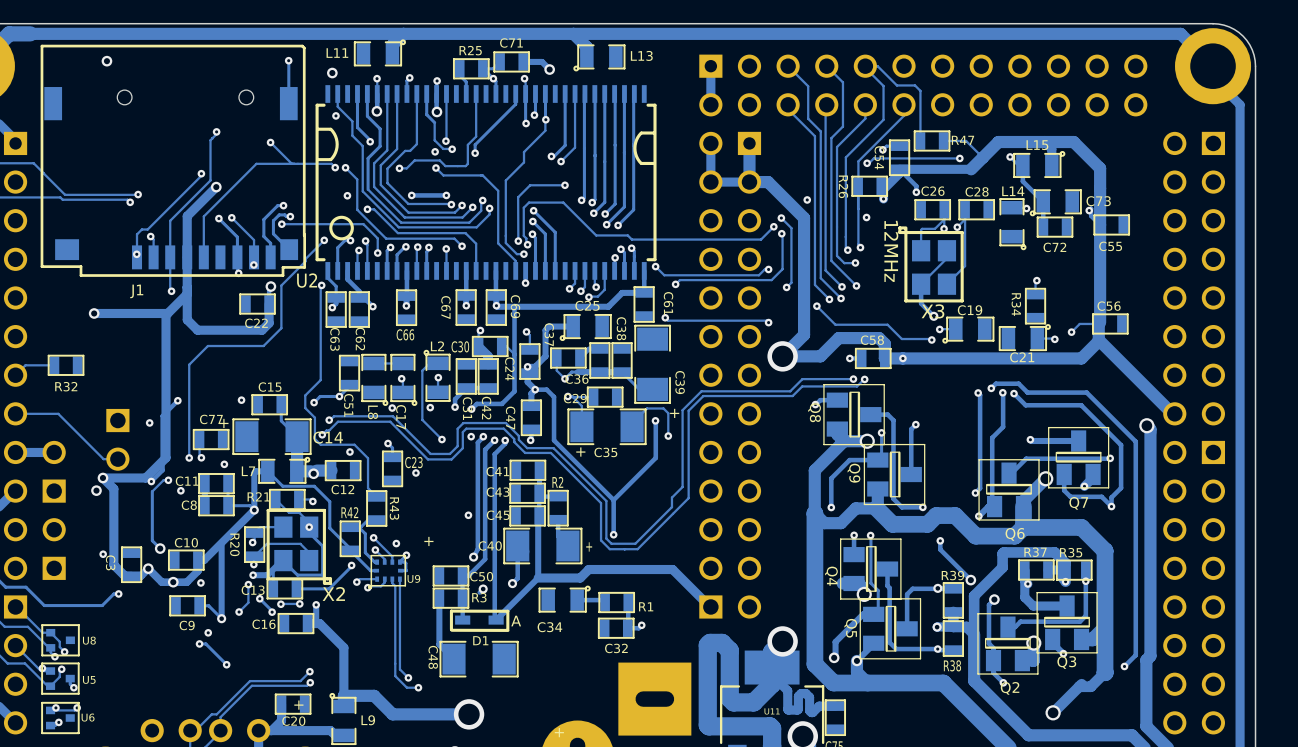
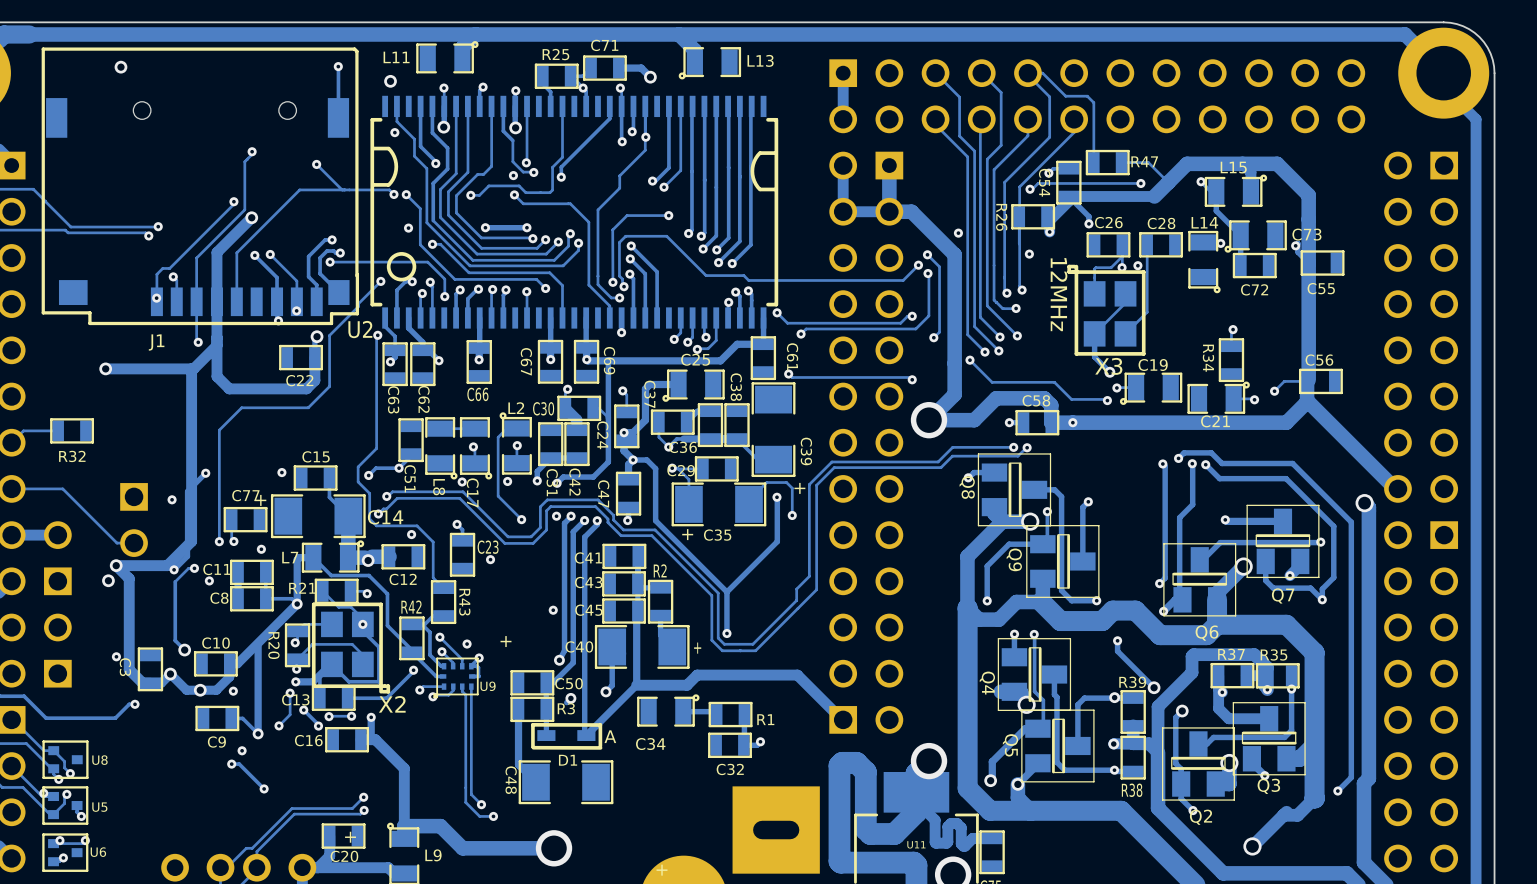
track: (965, 219) (957, 227) -> none

